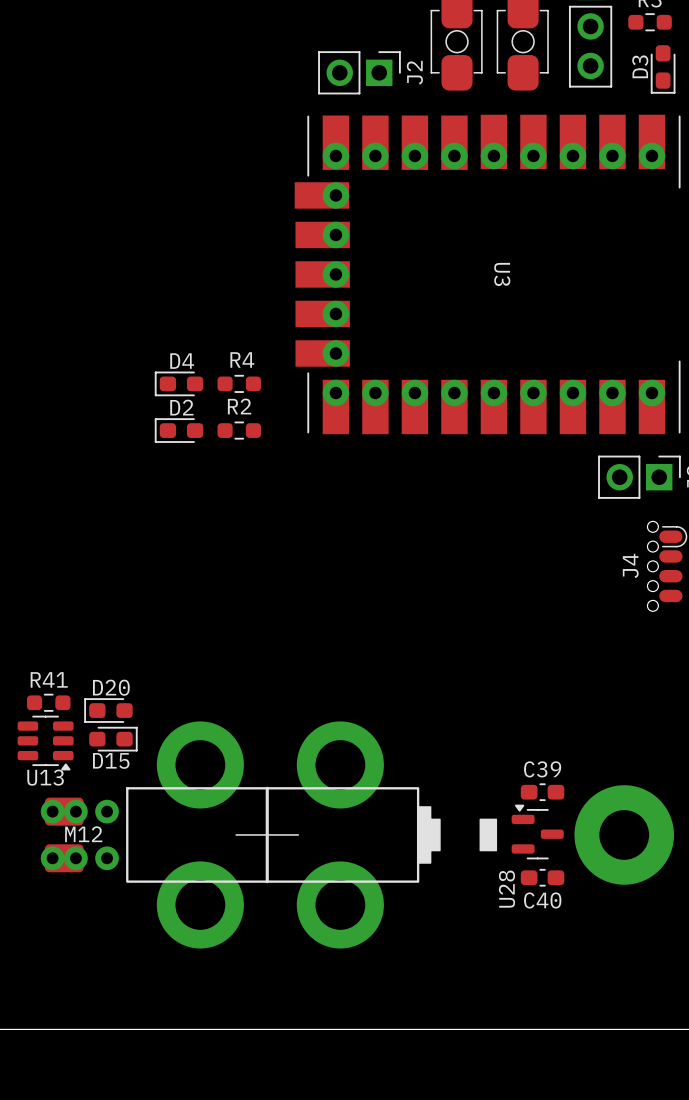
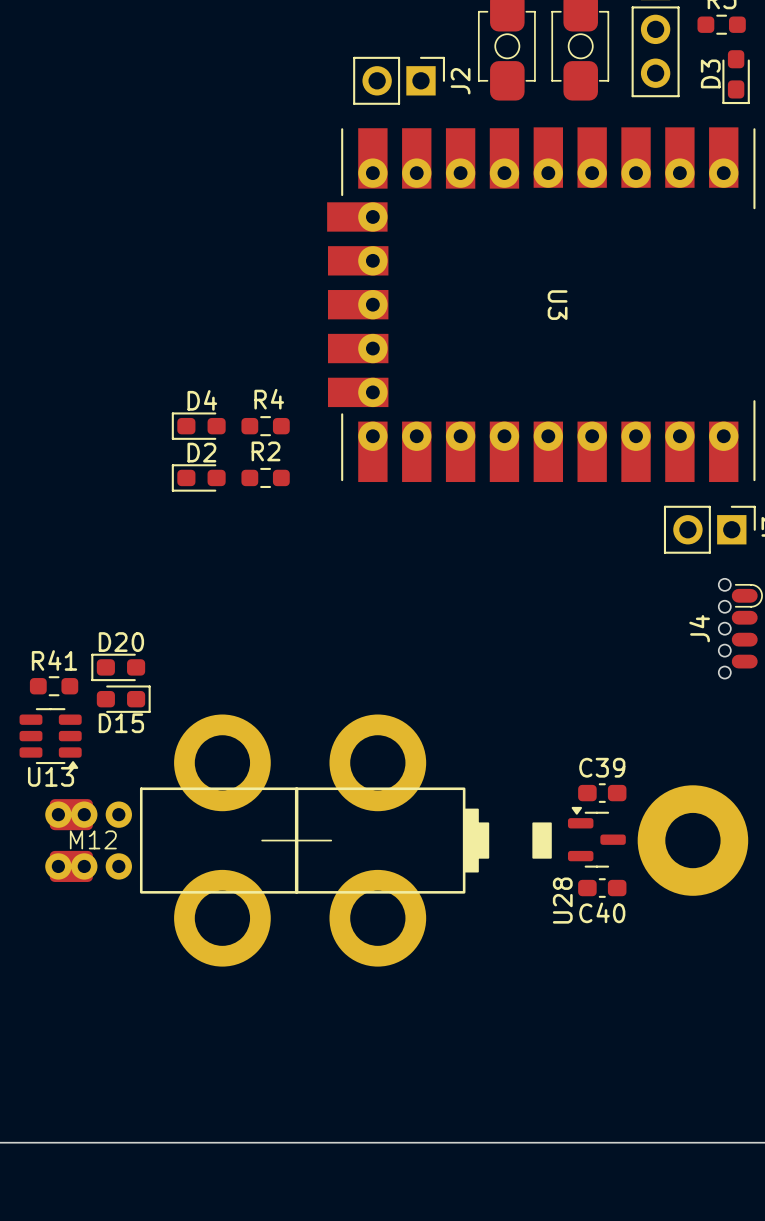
R41 position: (48, 702) -> (54, 686)
D20 position: (108, 710) -> (118, 667)
D15 position: (113, 739) -> (123, 699)
U13 position: (45, 743) -> (50, 738)
C39 position: (542, 792) -> (602, 793)
U28 position: (537, 832) -> (596, 837)
M12 position: (268, 834) -> (298, 840)
part position: (624, 834) -> (692, 840)
C40 position: (542, 877) -> (602, 888)

